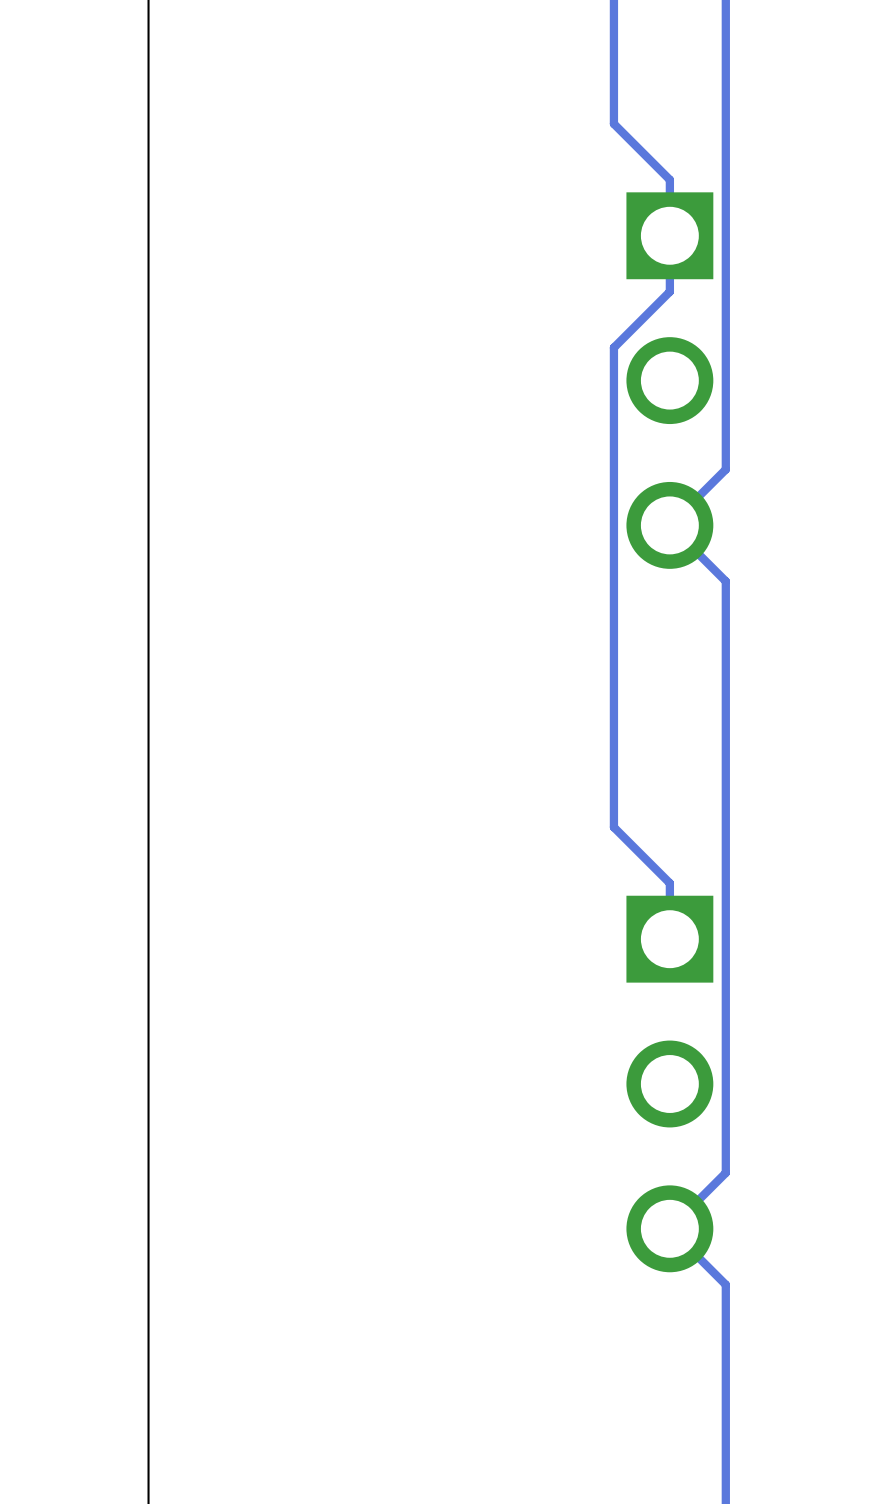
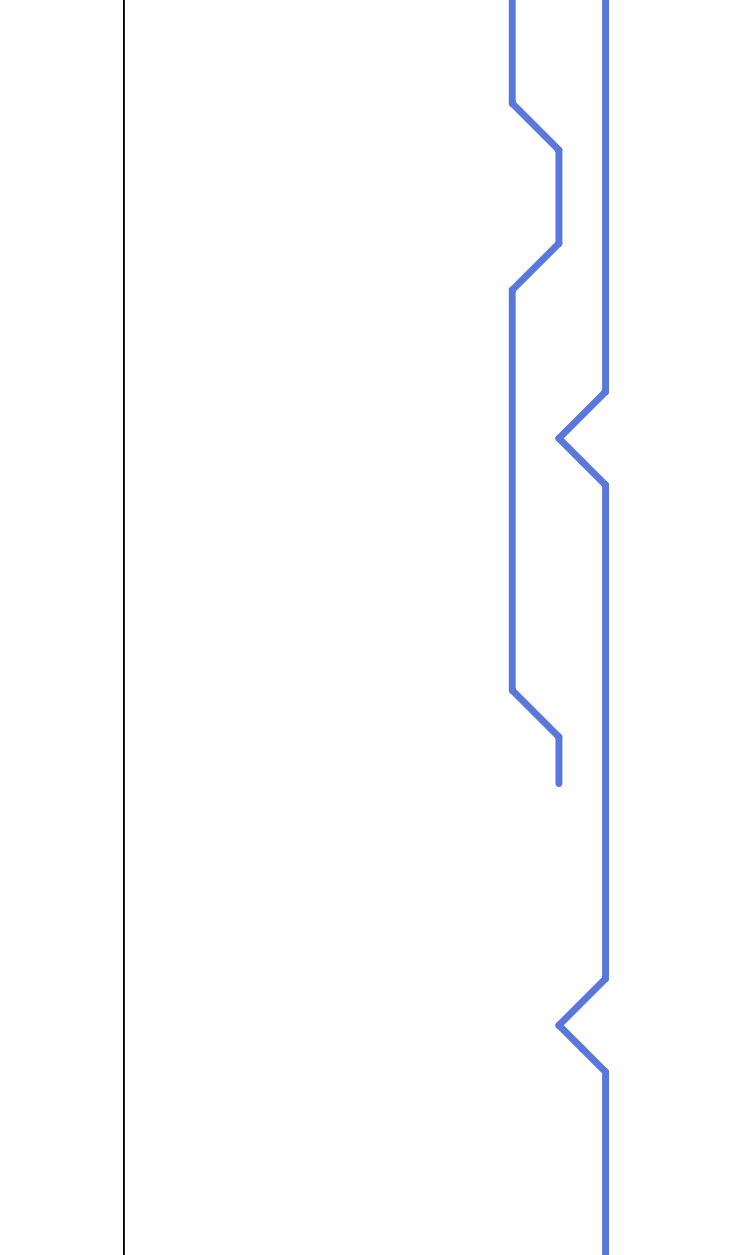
part: (669, 380) -> none
part: (669, 1084) -> none

